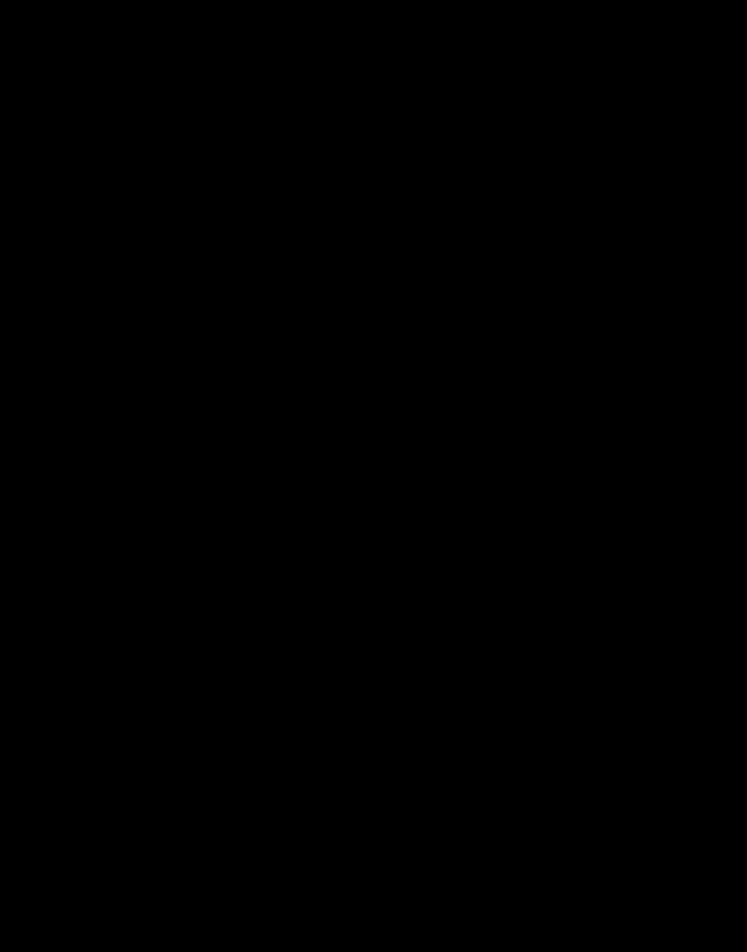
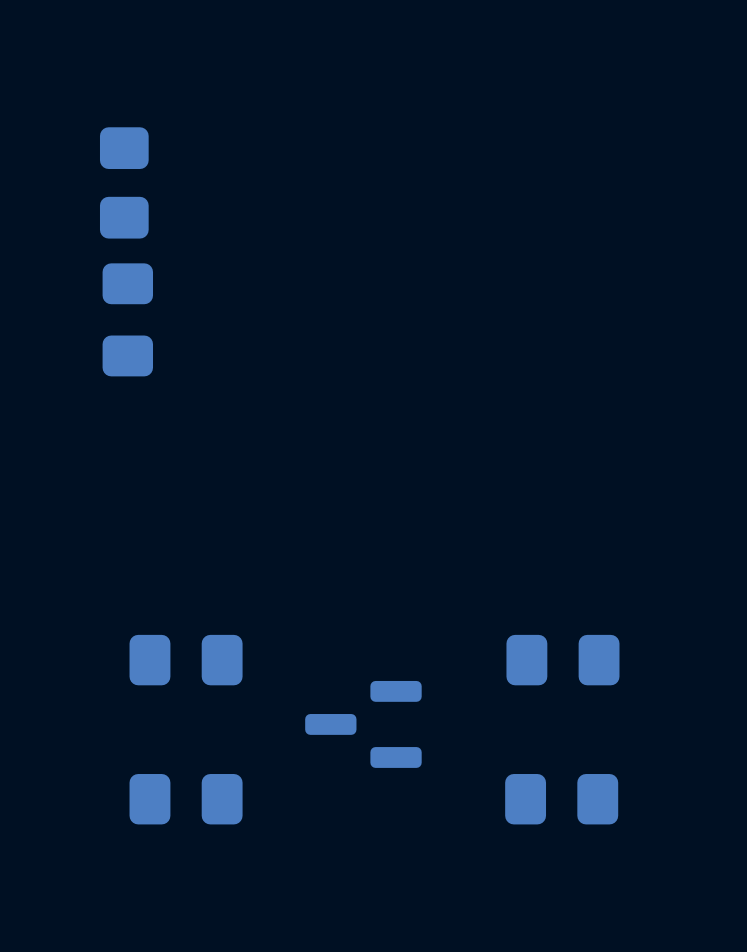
part: none -> (124, 182)
part: none -> (127, 319)
part: none -> (186, 660)
part: none -> (562, 660)
part: none -> (363, 724)
part: none -> (186, 799)
part: none -> (561, 799)

